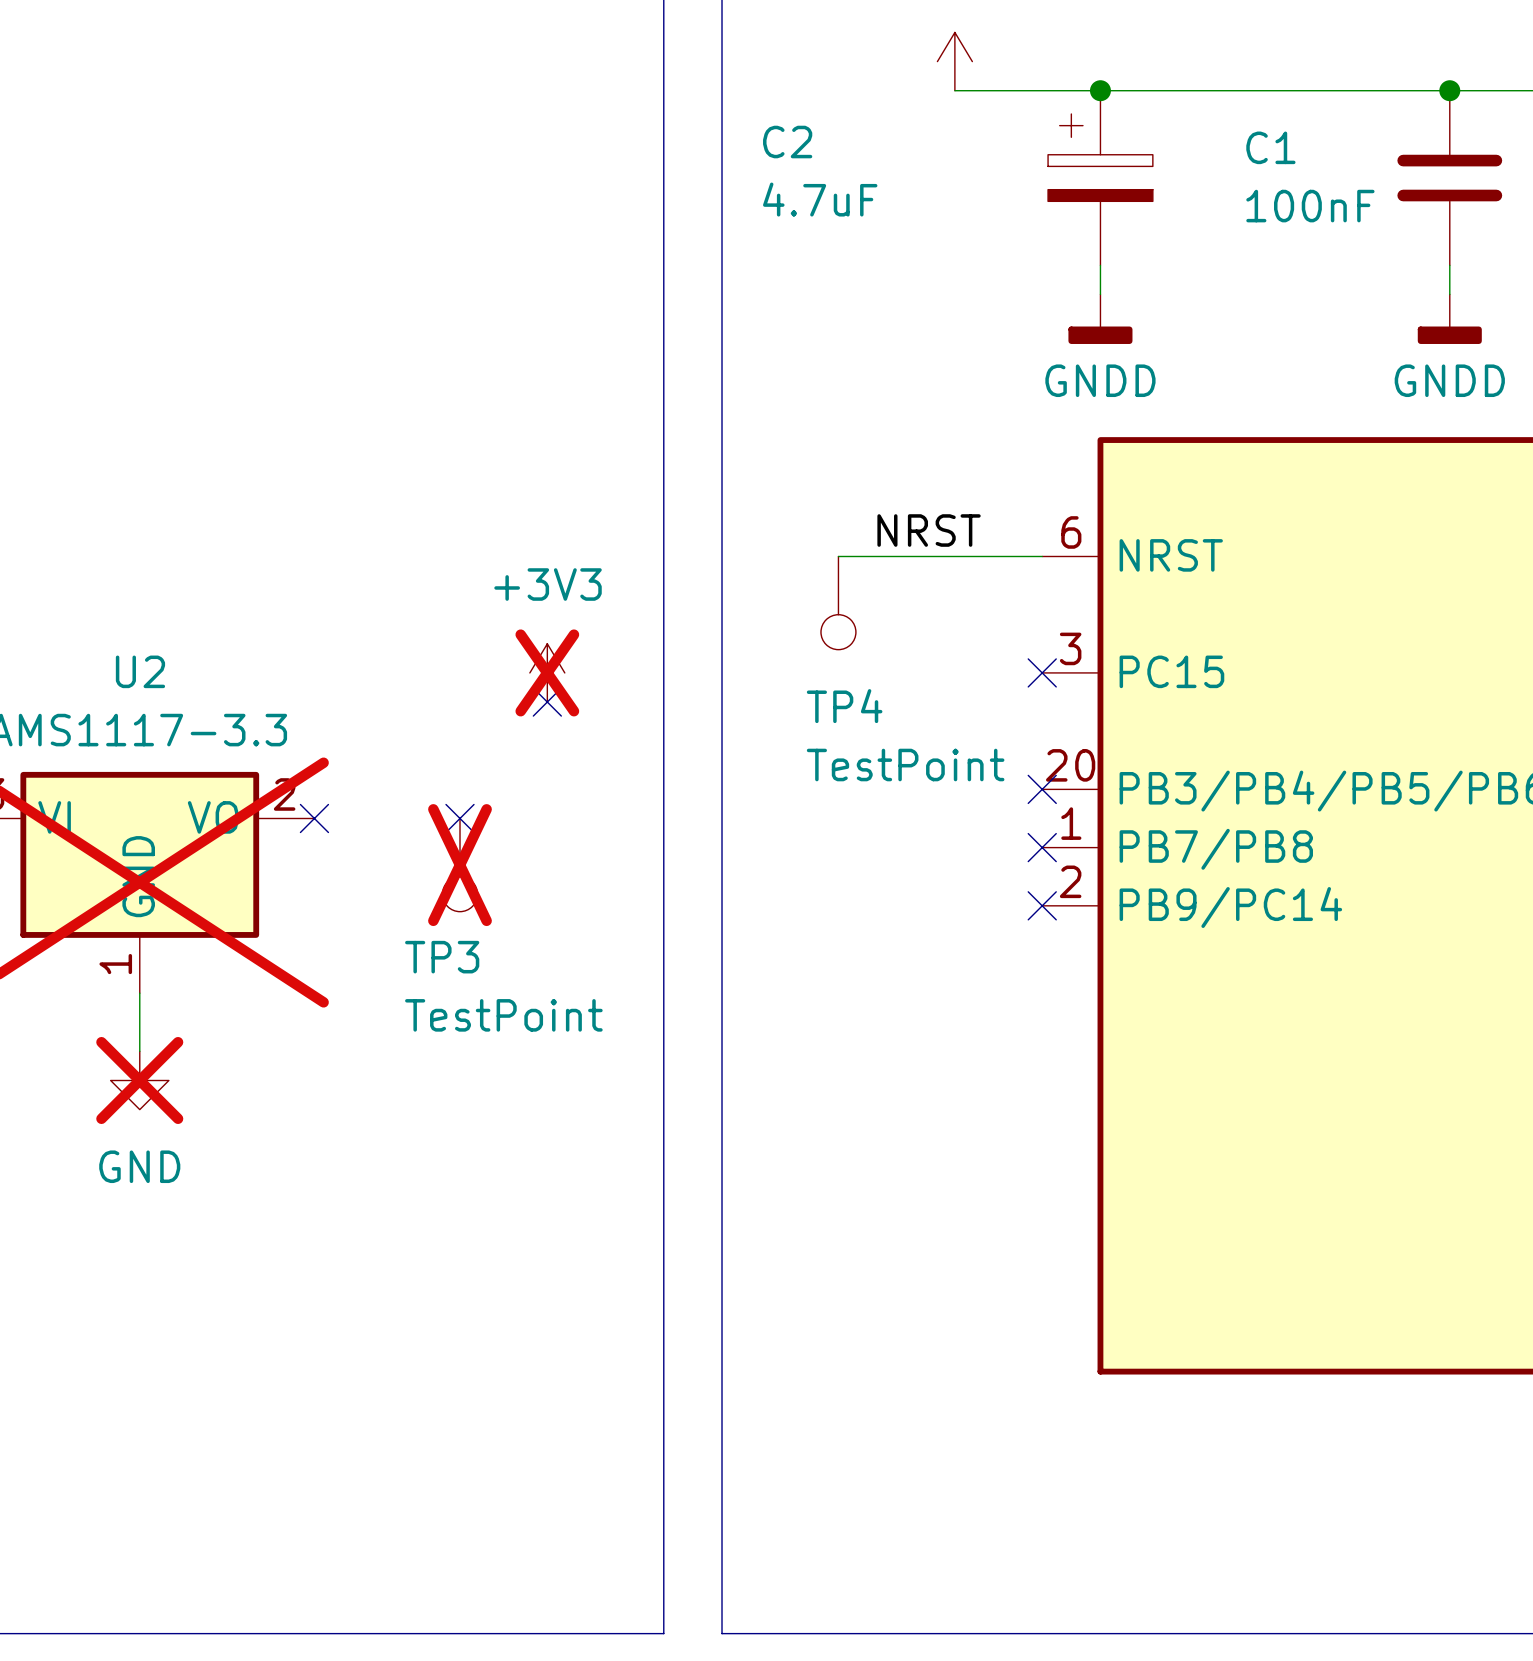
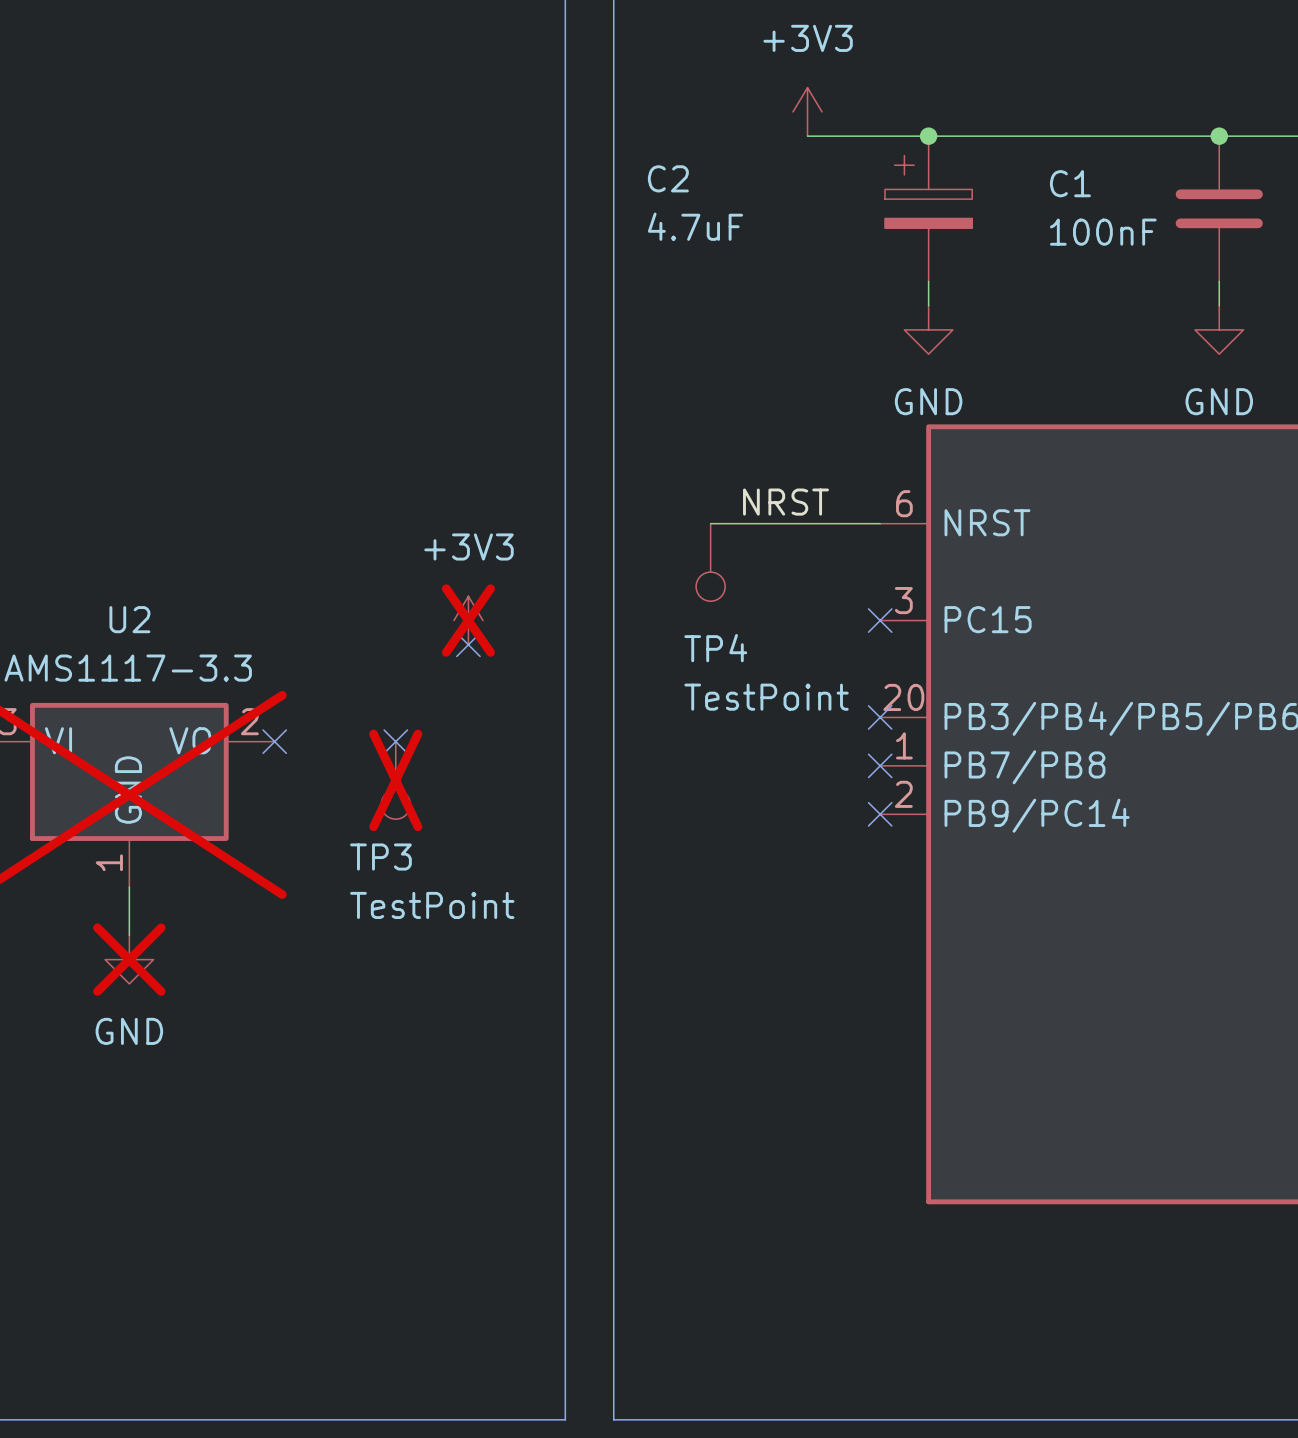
power symbol: GNDD (1100, 319) -> GND (928, 329)
power symbol: GNDD (1449, 319) -> GND (1219, 329)

